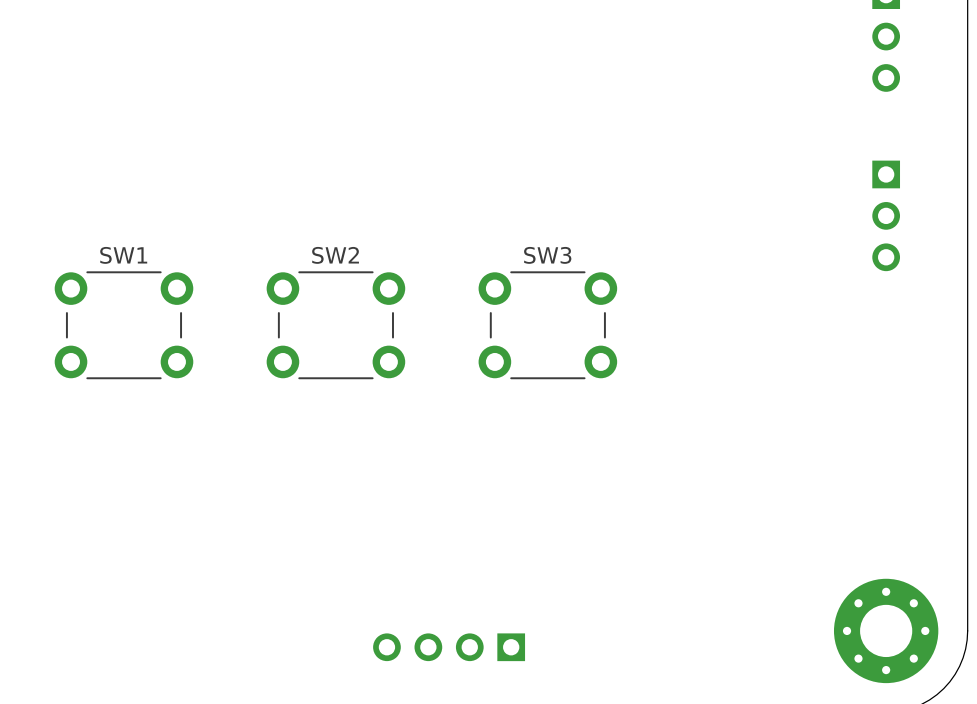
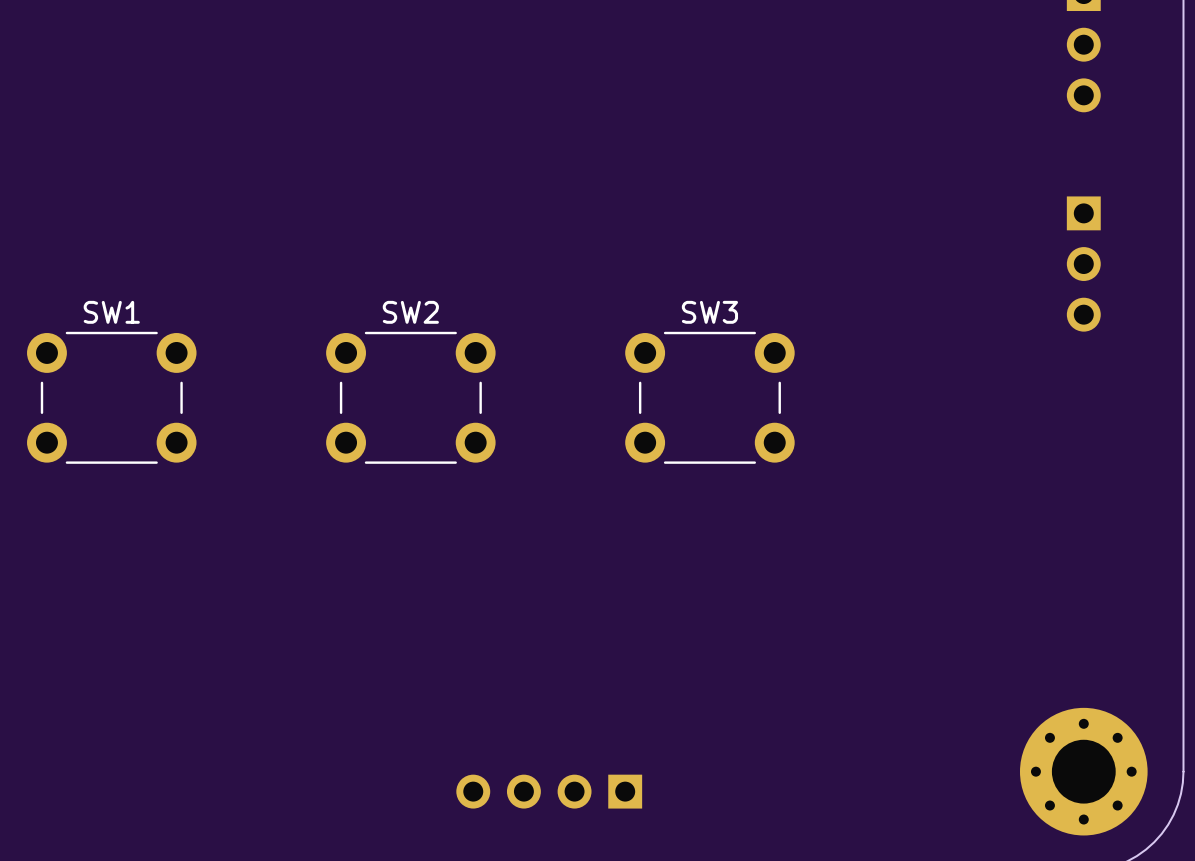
SW1 position: (123, 325) -> (111, 397)
SW3 position: (547, 325) -> (709, 397)

